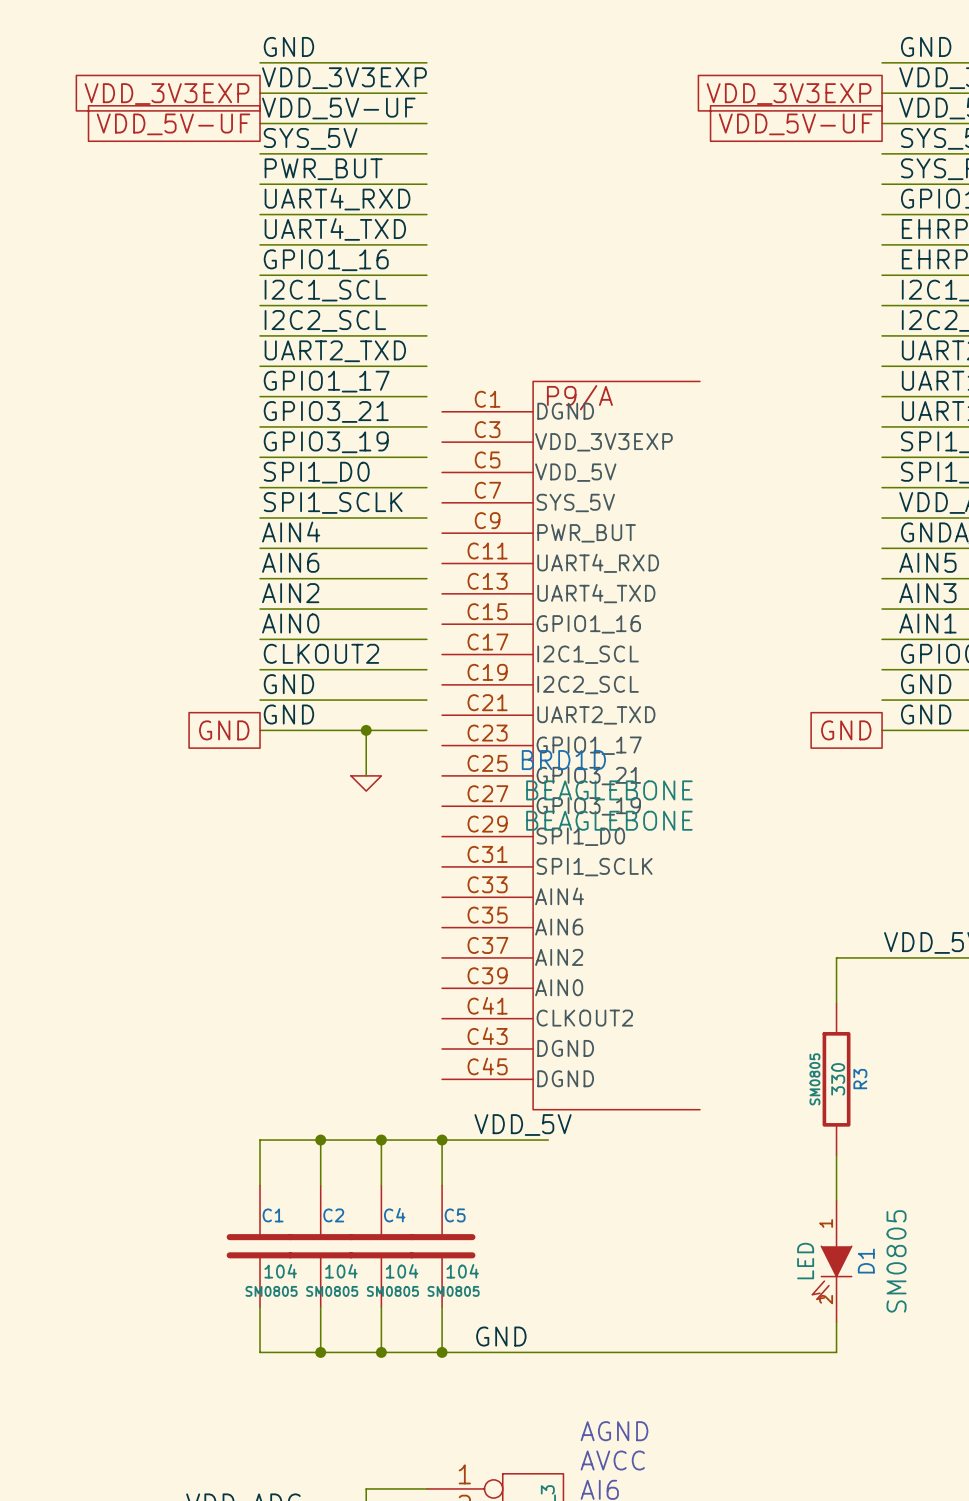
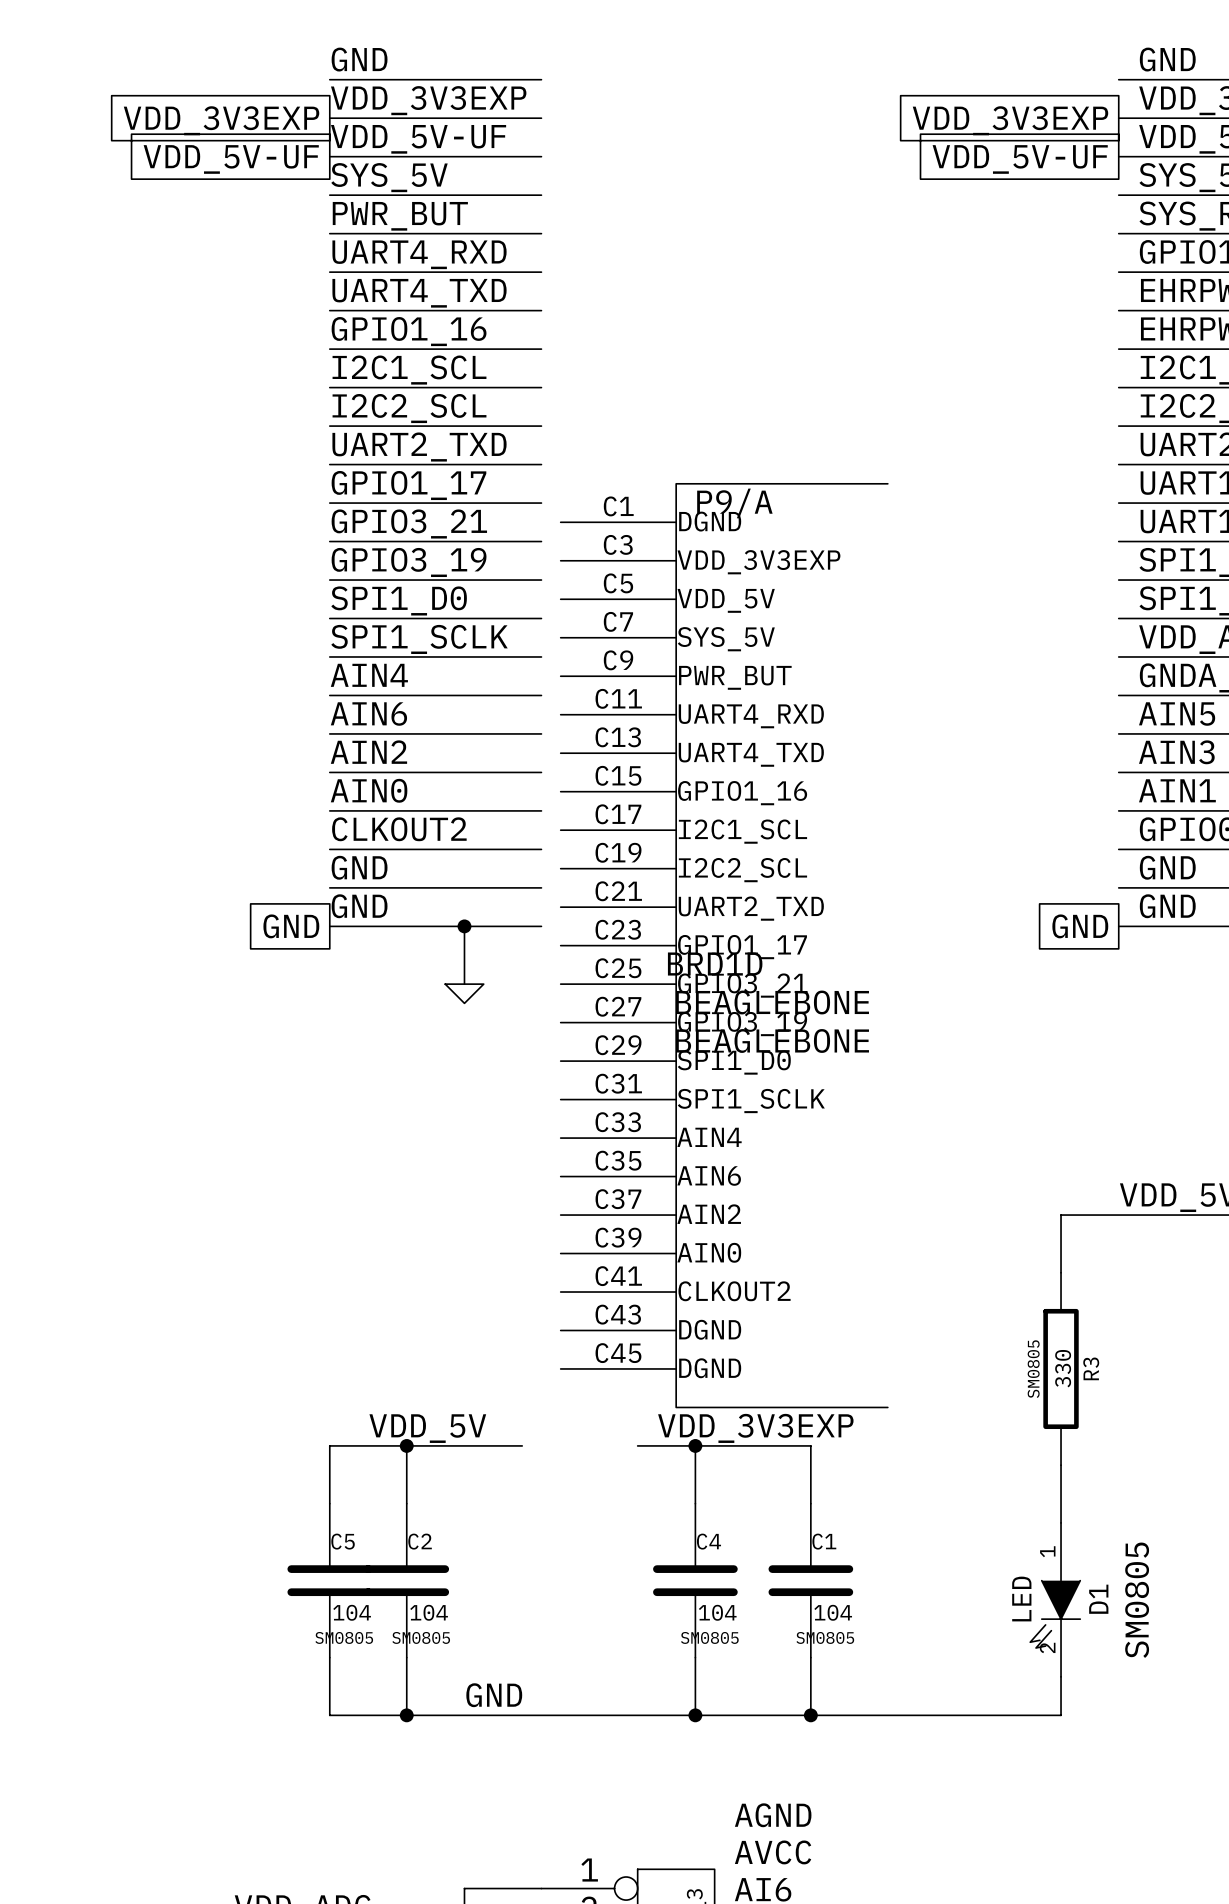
label position: VDD_5V (523, 1125) -> VDD_5V (427, 1428)
label: none -> VDD_3V3EXP (755, 1428)
wire: (381, 1140) (381, 1185) -> none
junction: (381, 1140) -> none
wire: (411, 1140) (502, 1140) -> none
wire: (442, 1140) (442, 1185) -> none
junction: (442, 1140) -> none
junction: none -> (695, 1445)
wire: none -> (695, 1503) (695, 1445) (810, 1445) (810, 1503)
C1 name: C1 (273, 1215) -> C5 (343, 1541)
C4 position: (381, 1246) -> (695, 1580)
C5: 104 (442, 1246) -> none
C1: none -> 104 (810, 1580)
wire: (381, 1306) (381, 1352) -> (810, 1657) (810, 1715)
wire: (442, 1306) (442, 1352) -> (695, 1657) (695, 1715)
label position: GND (501, 1336) -> GND (494, 1695)
junction: (381, 1352) -> none
junction: (442, 1352) -> none
junction: none -> (695, 1715)
junction: none -> (810, 1715)

